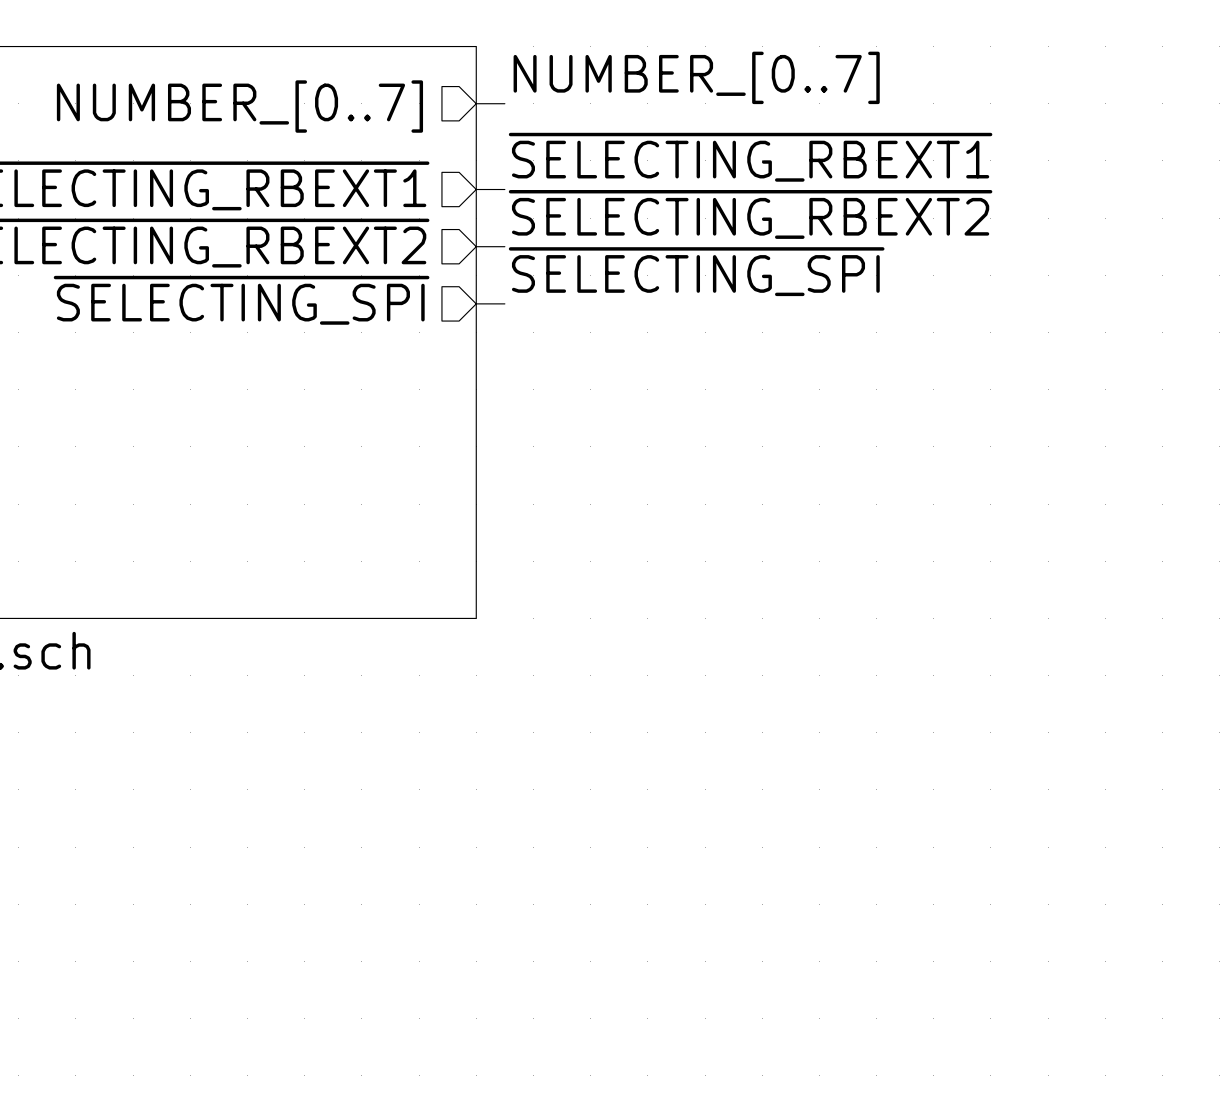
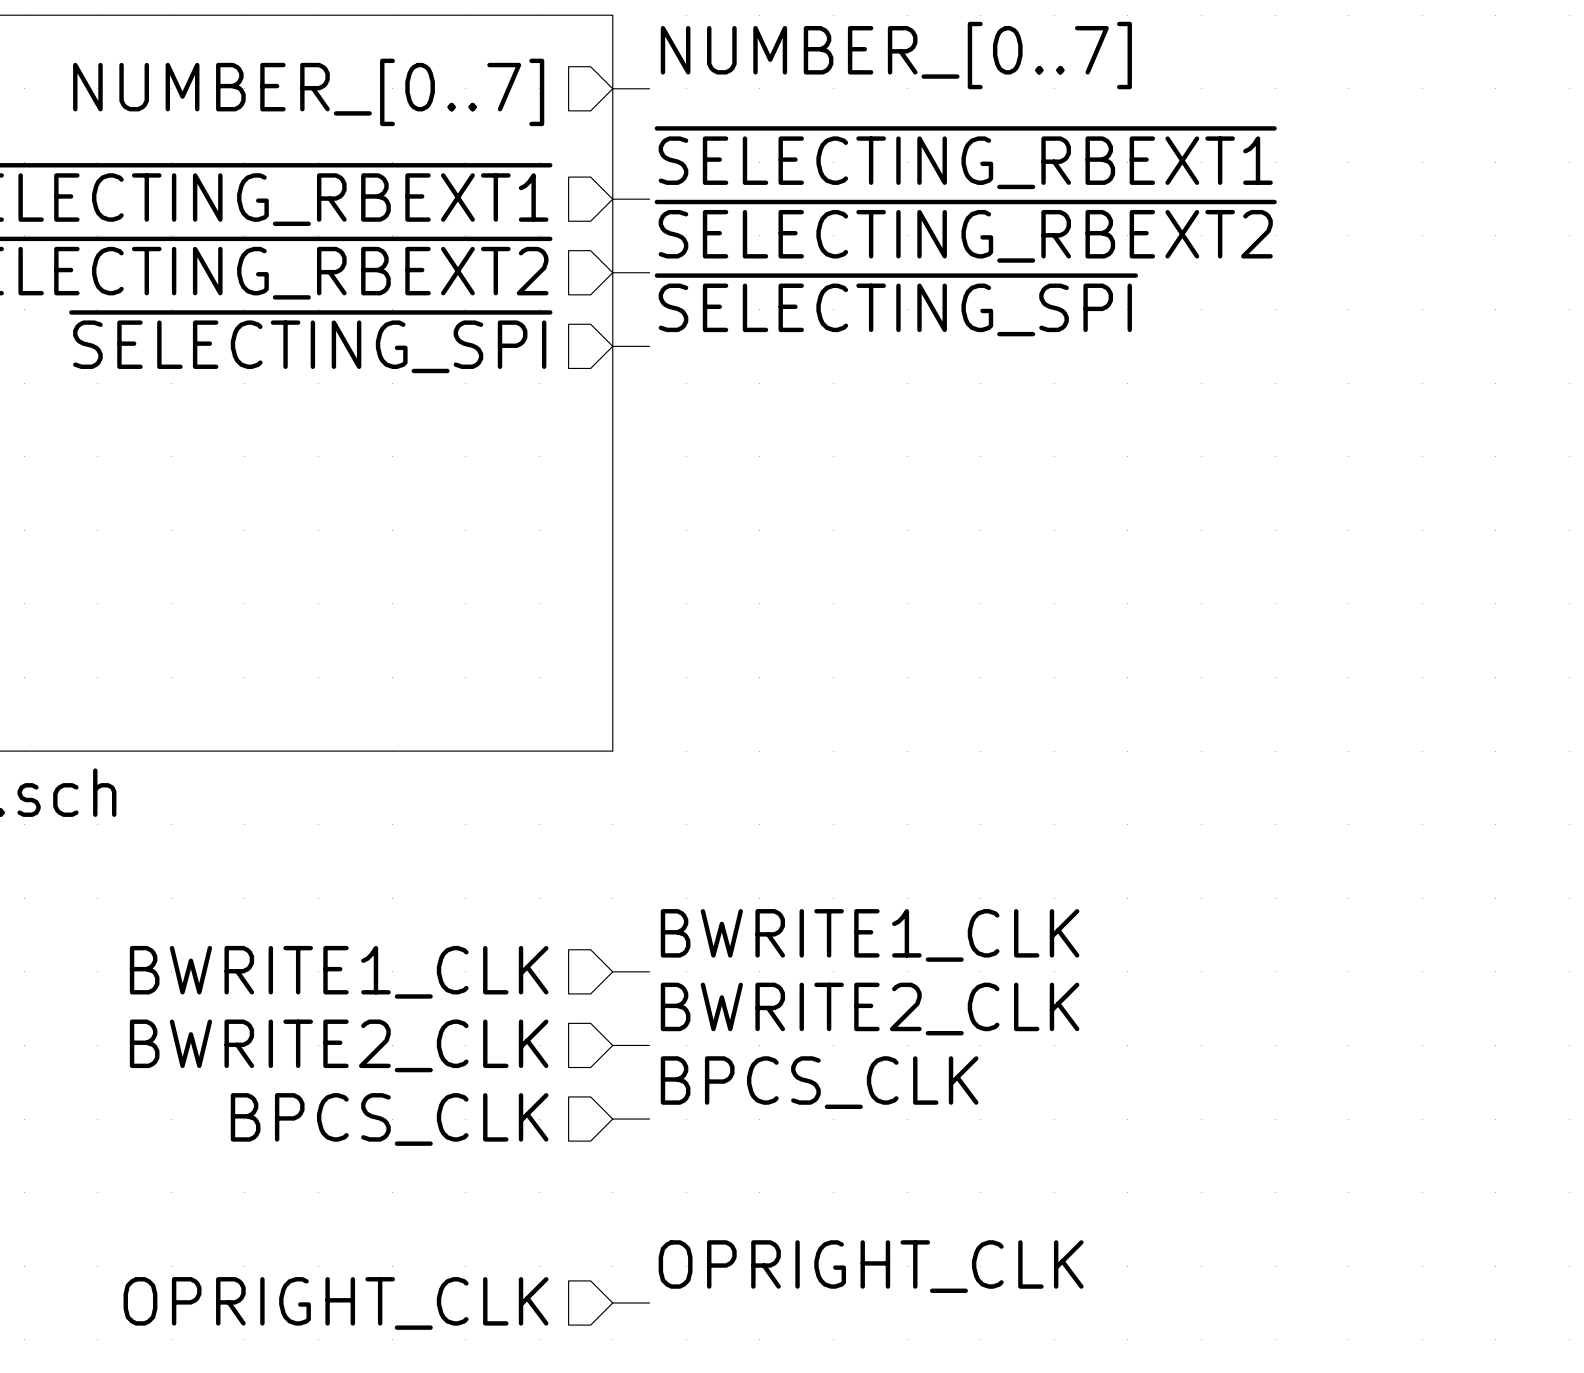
label: none -> BWRITE1_CLK (870, 935)
wire: none -> (612, 971) (649, 971)
sheet pin: none -> BWRITE1_CLK (339, 972)
label: none -> BWRITE2_CLK (870, 1009)
sheet pin: none -> BWRITE2_CLK (339, 1045)
wire: none -> (612, 1045) (649, 1045)
label: none -> BPCS_CLK (819, 1082)
sheet pin: none -> BPCS_CLK (389, 1119)
wire: none -> (612, 1119) (649, 1119)
label: none -> OPRIGHT_CLK (871, 1266)
sheet pin: none -> OPRIGHT_CLK (336, 1303)
wire: none -> (612, 1303) (649, 1303)

